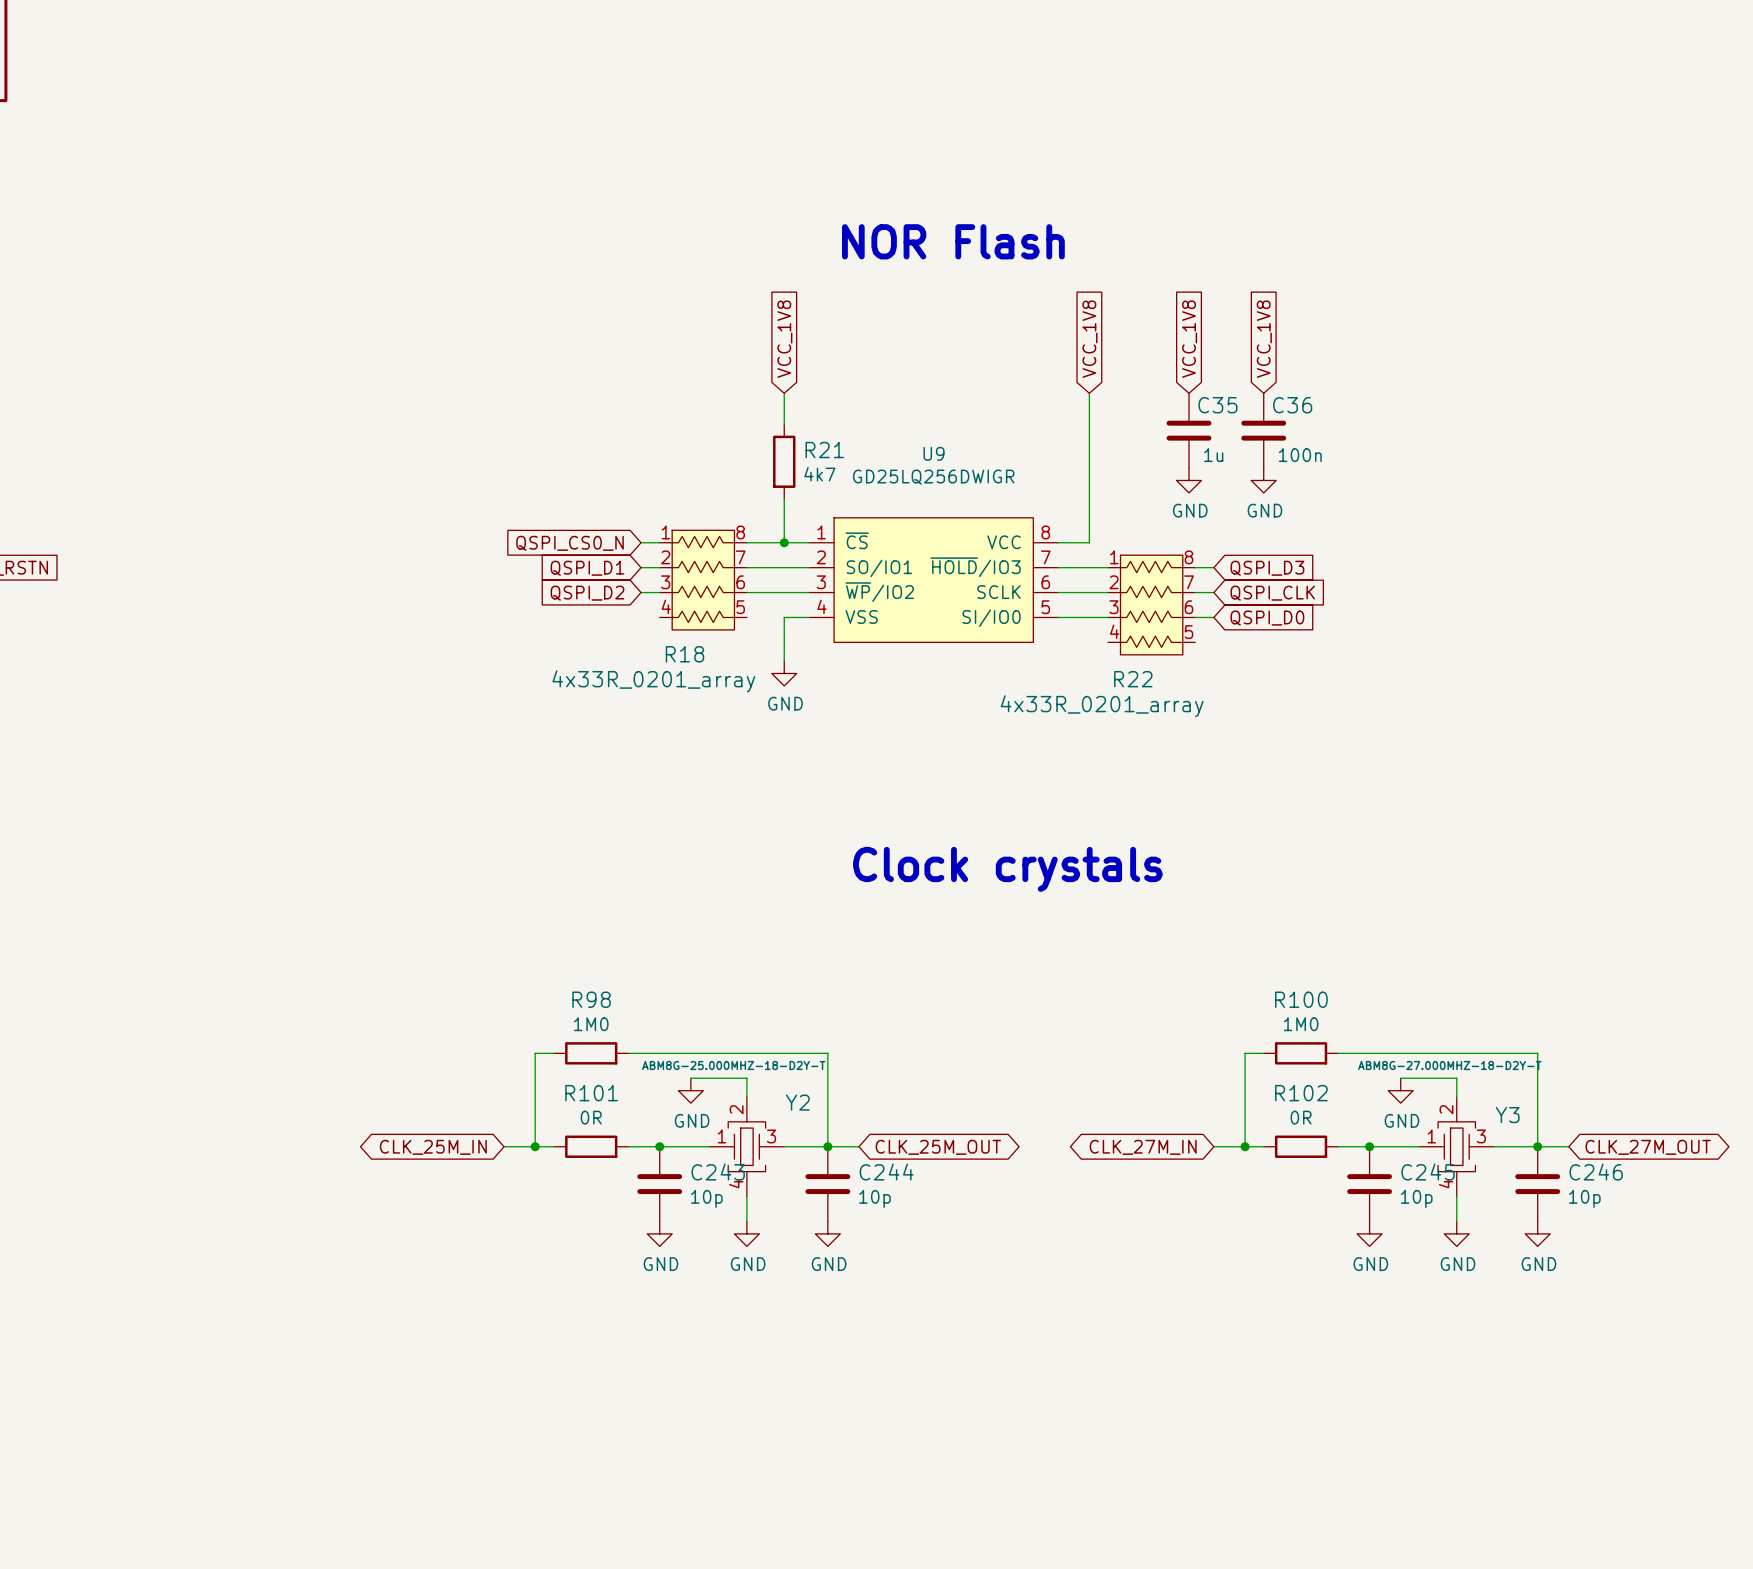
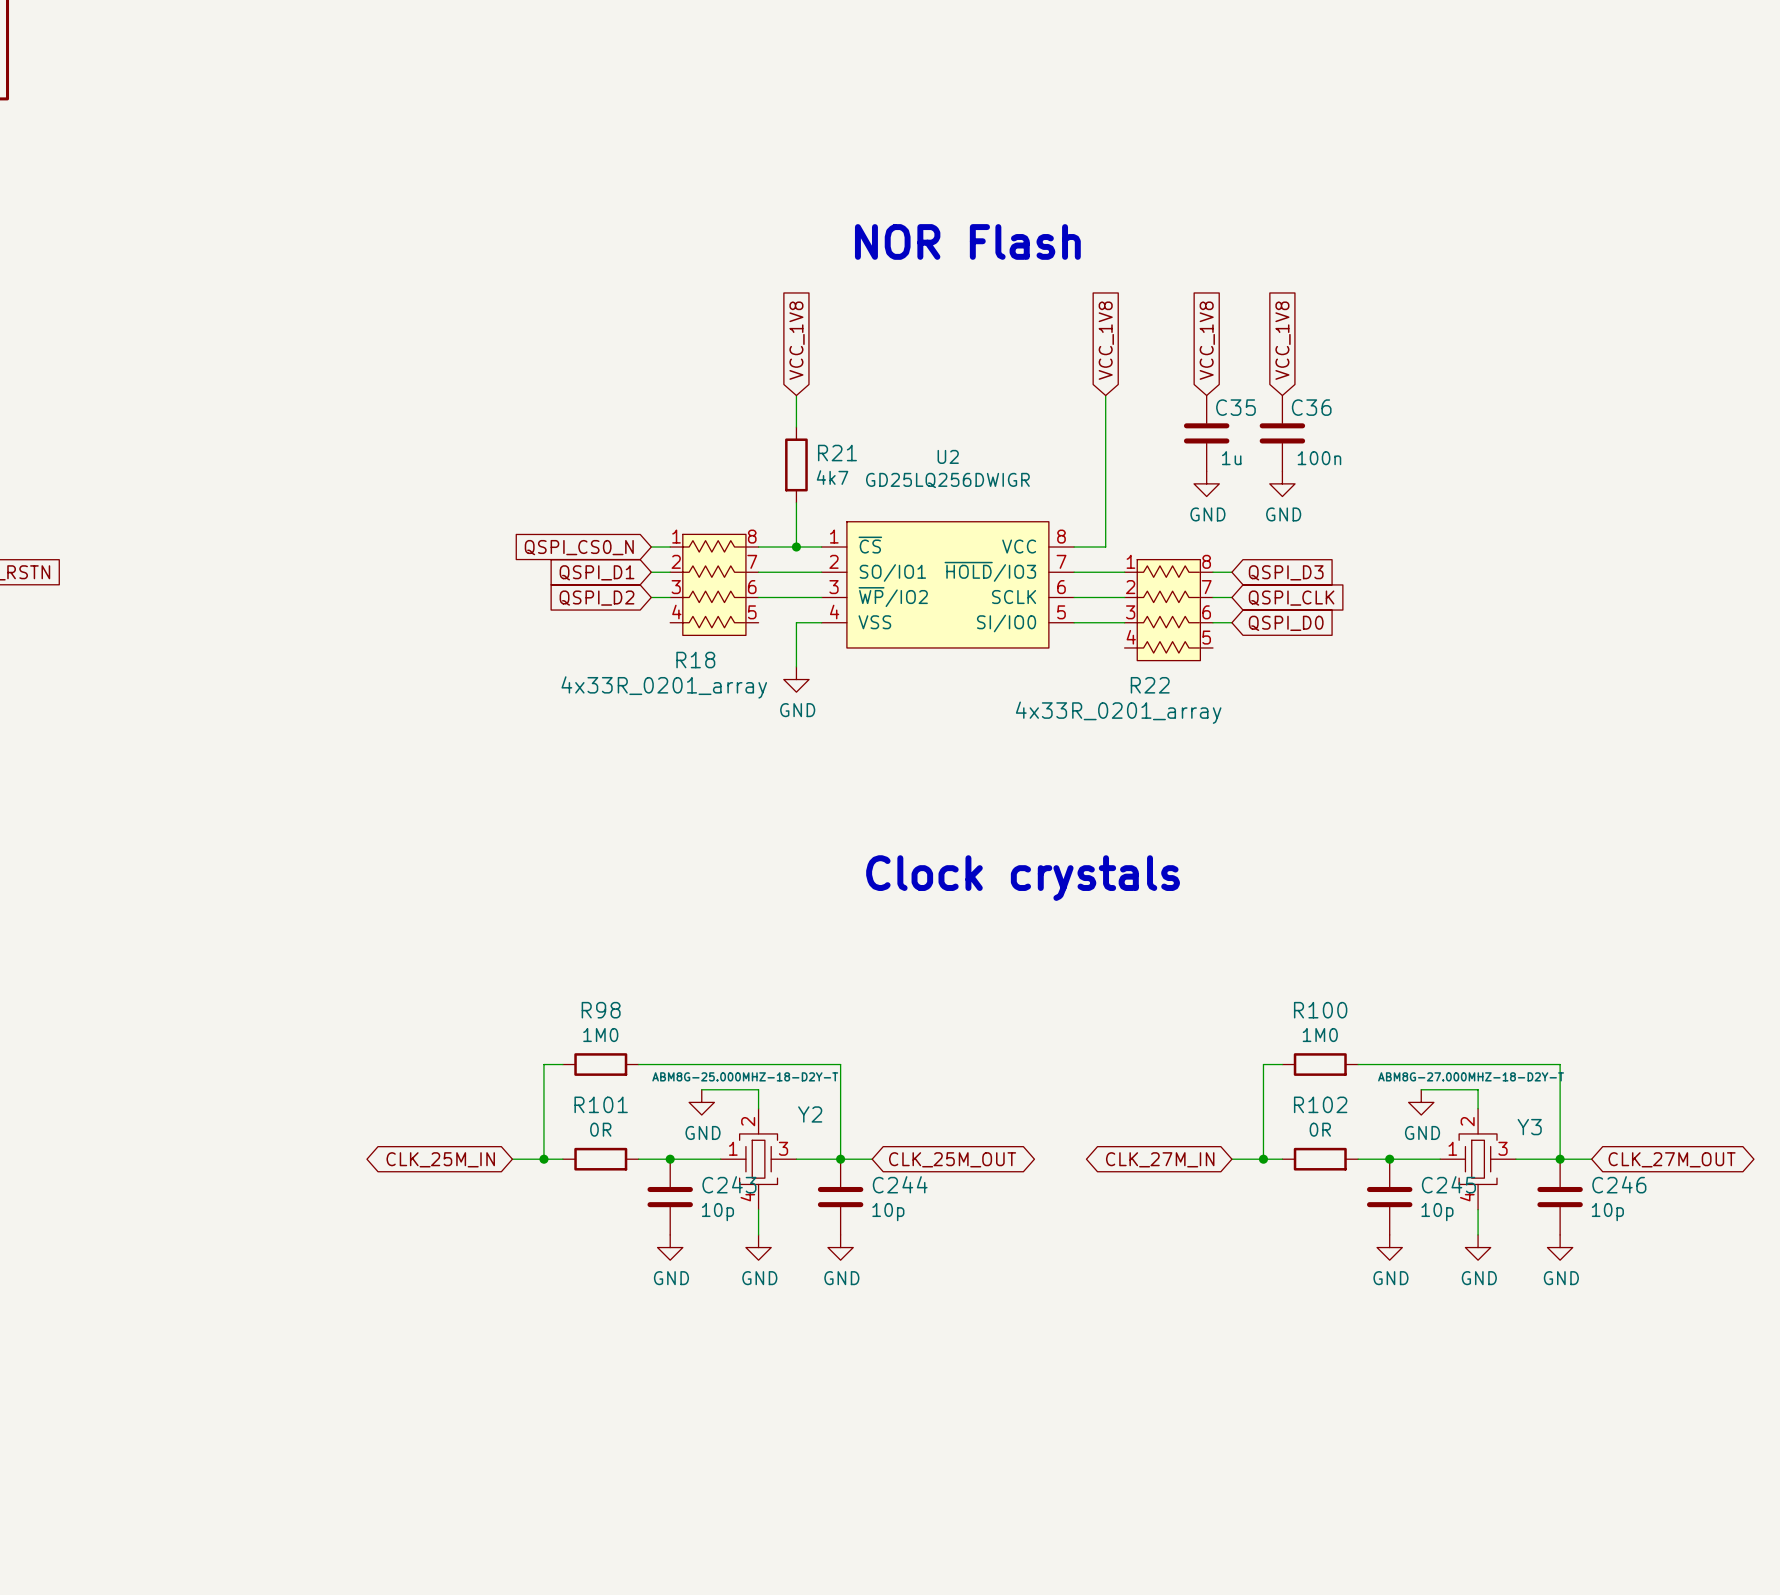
U9 name: U9 (934, 453) -> U2 (948, 456)

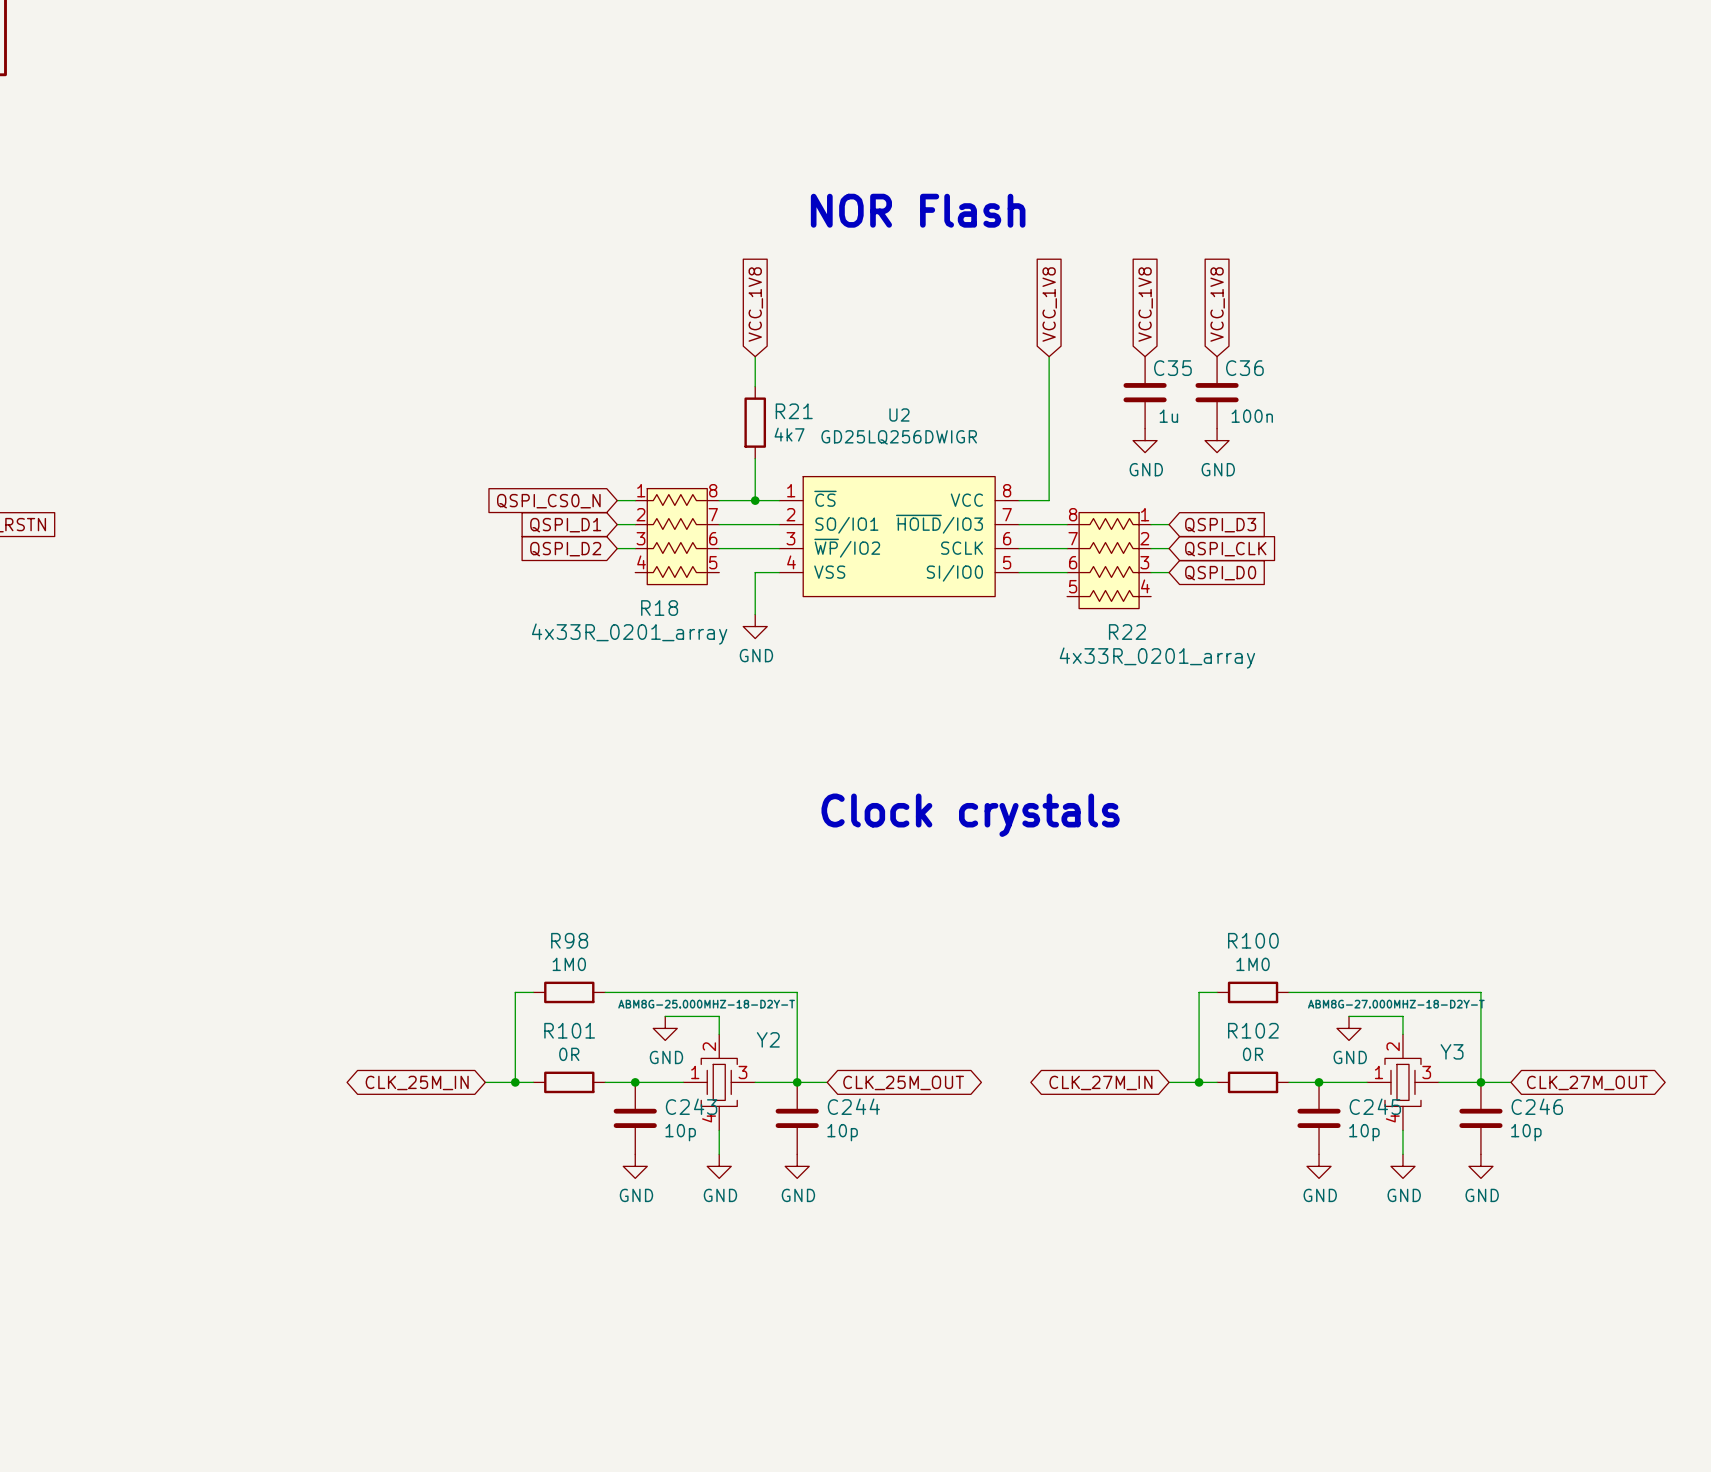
R22 flip: as is (1168, 610) -> left-right (1109, 560)

